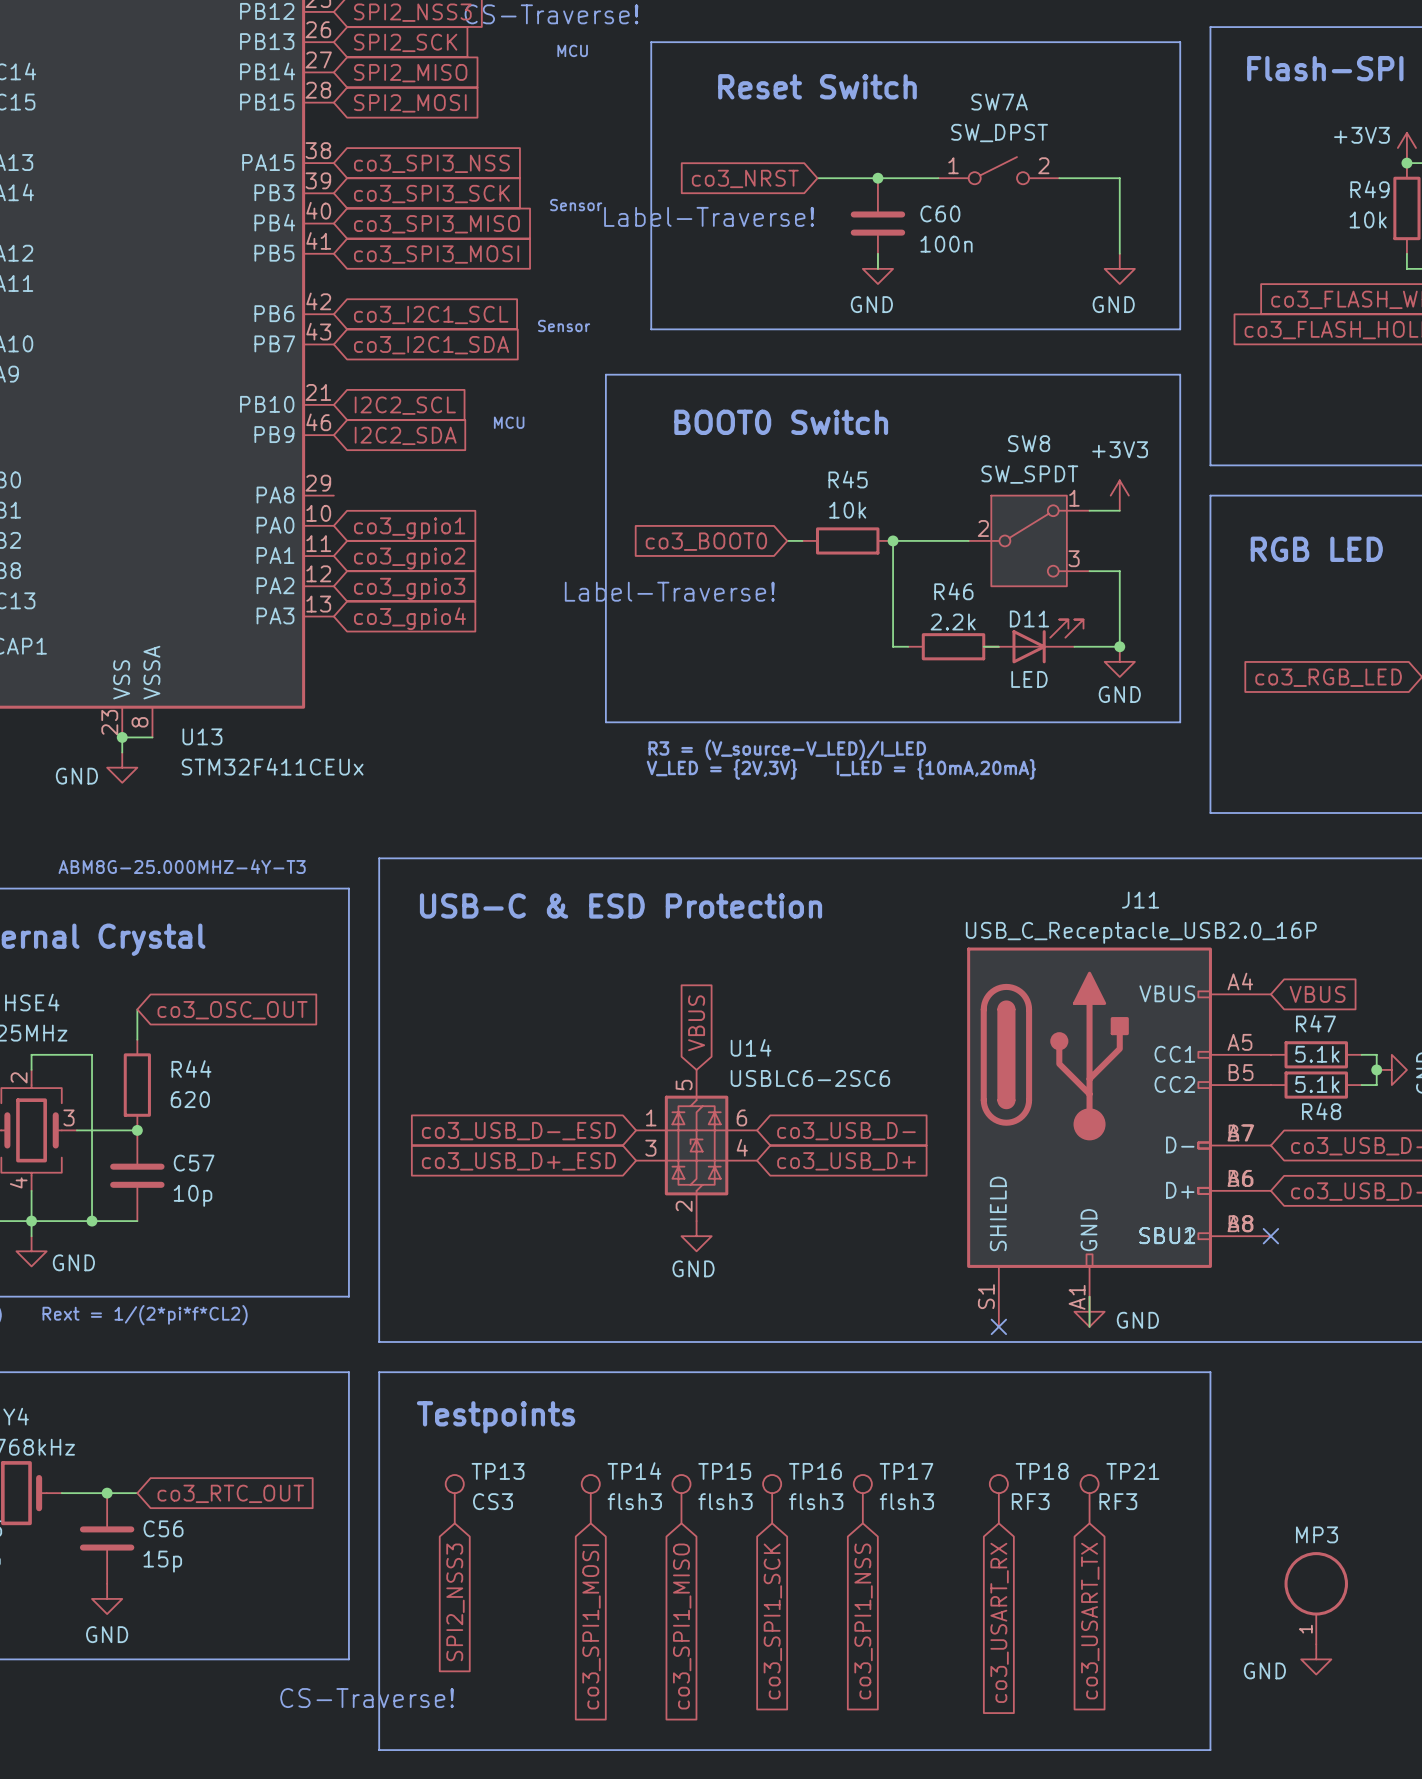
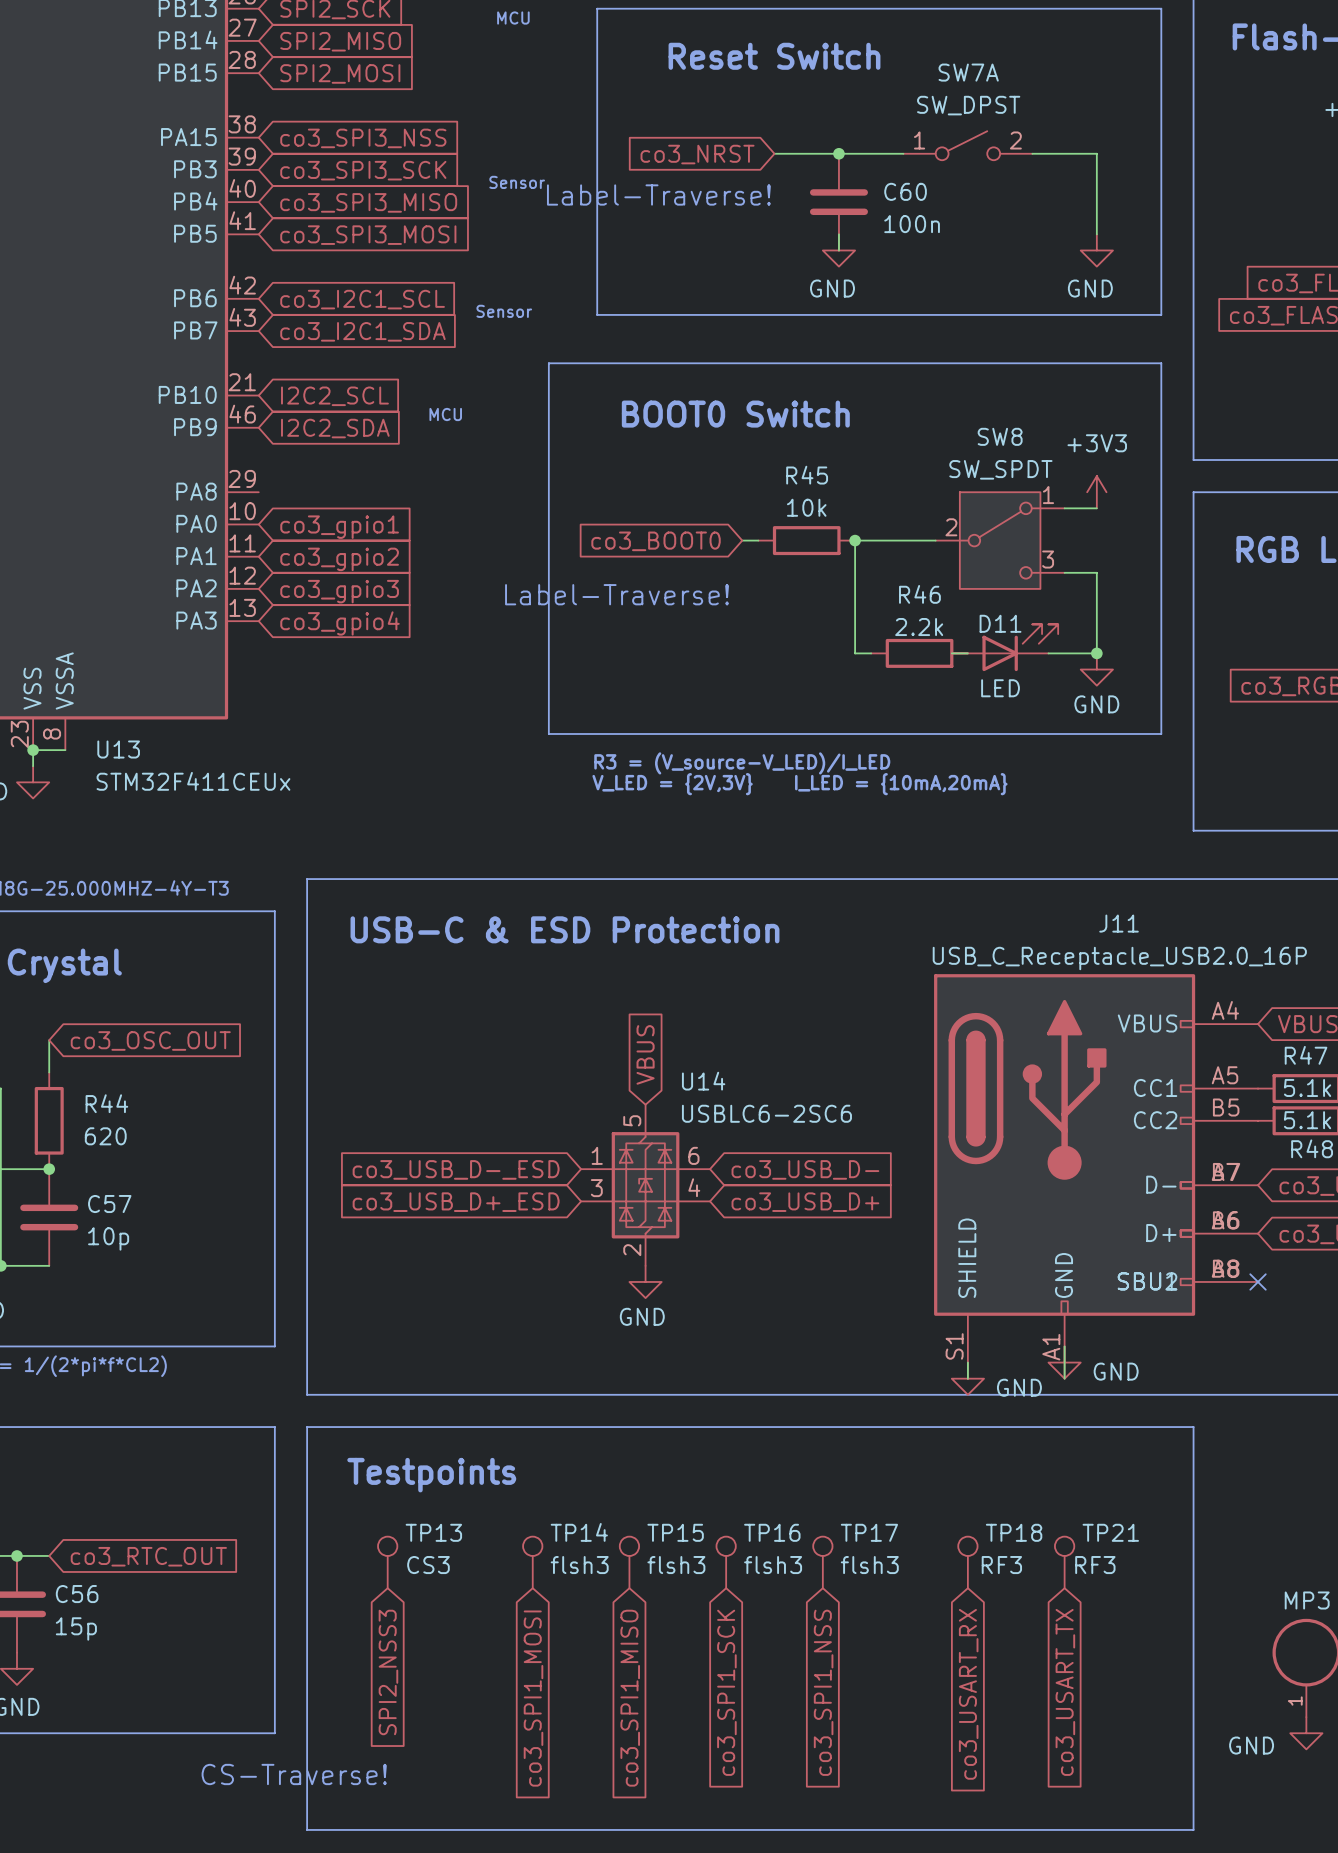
no-connect mark: (998, 1326) -> none
power symbol: none -> GND (967, 1378)

